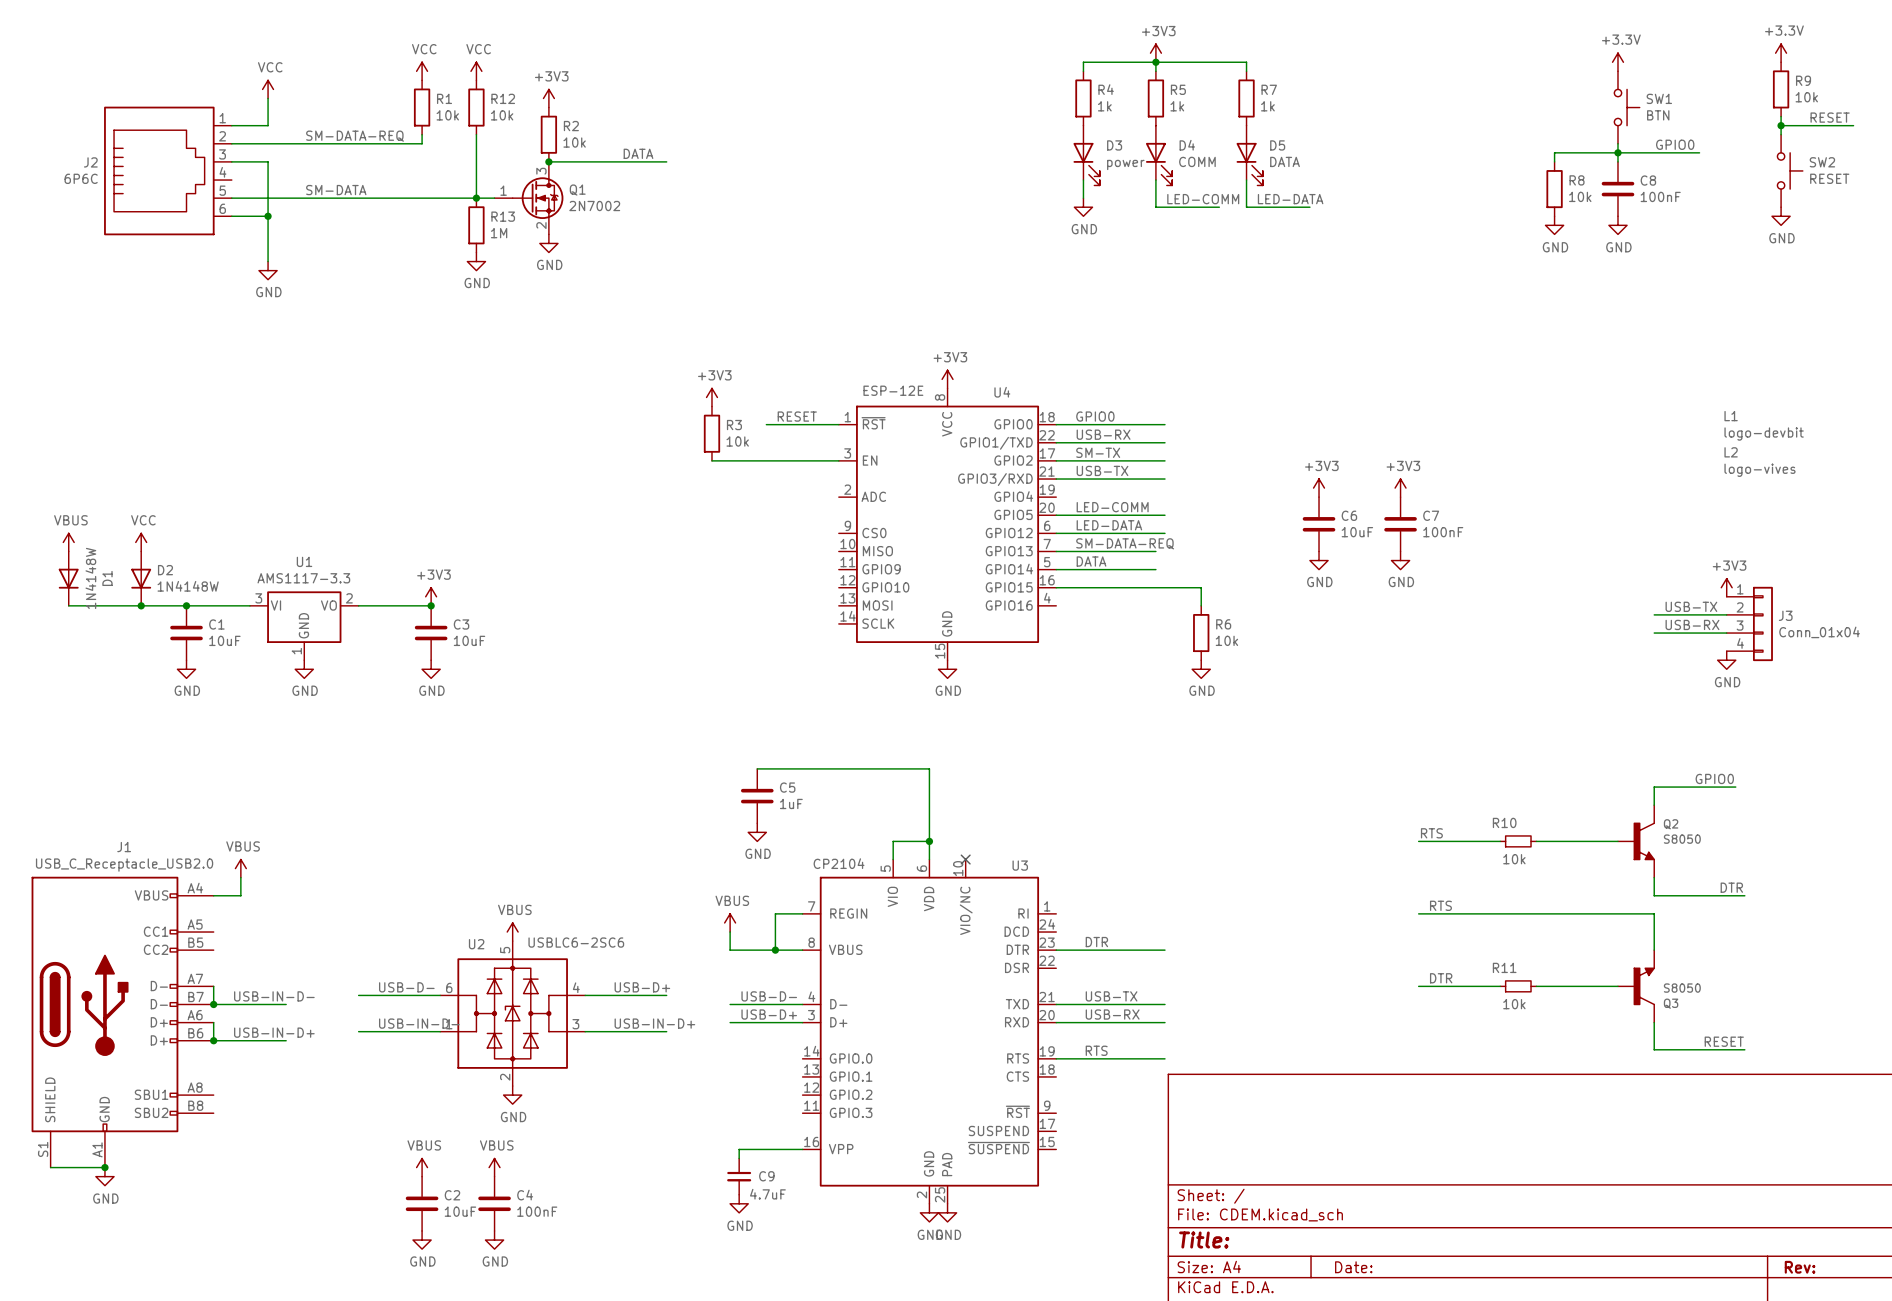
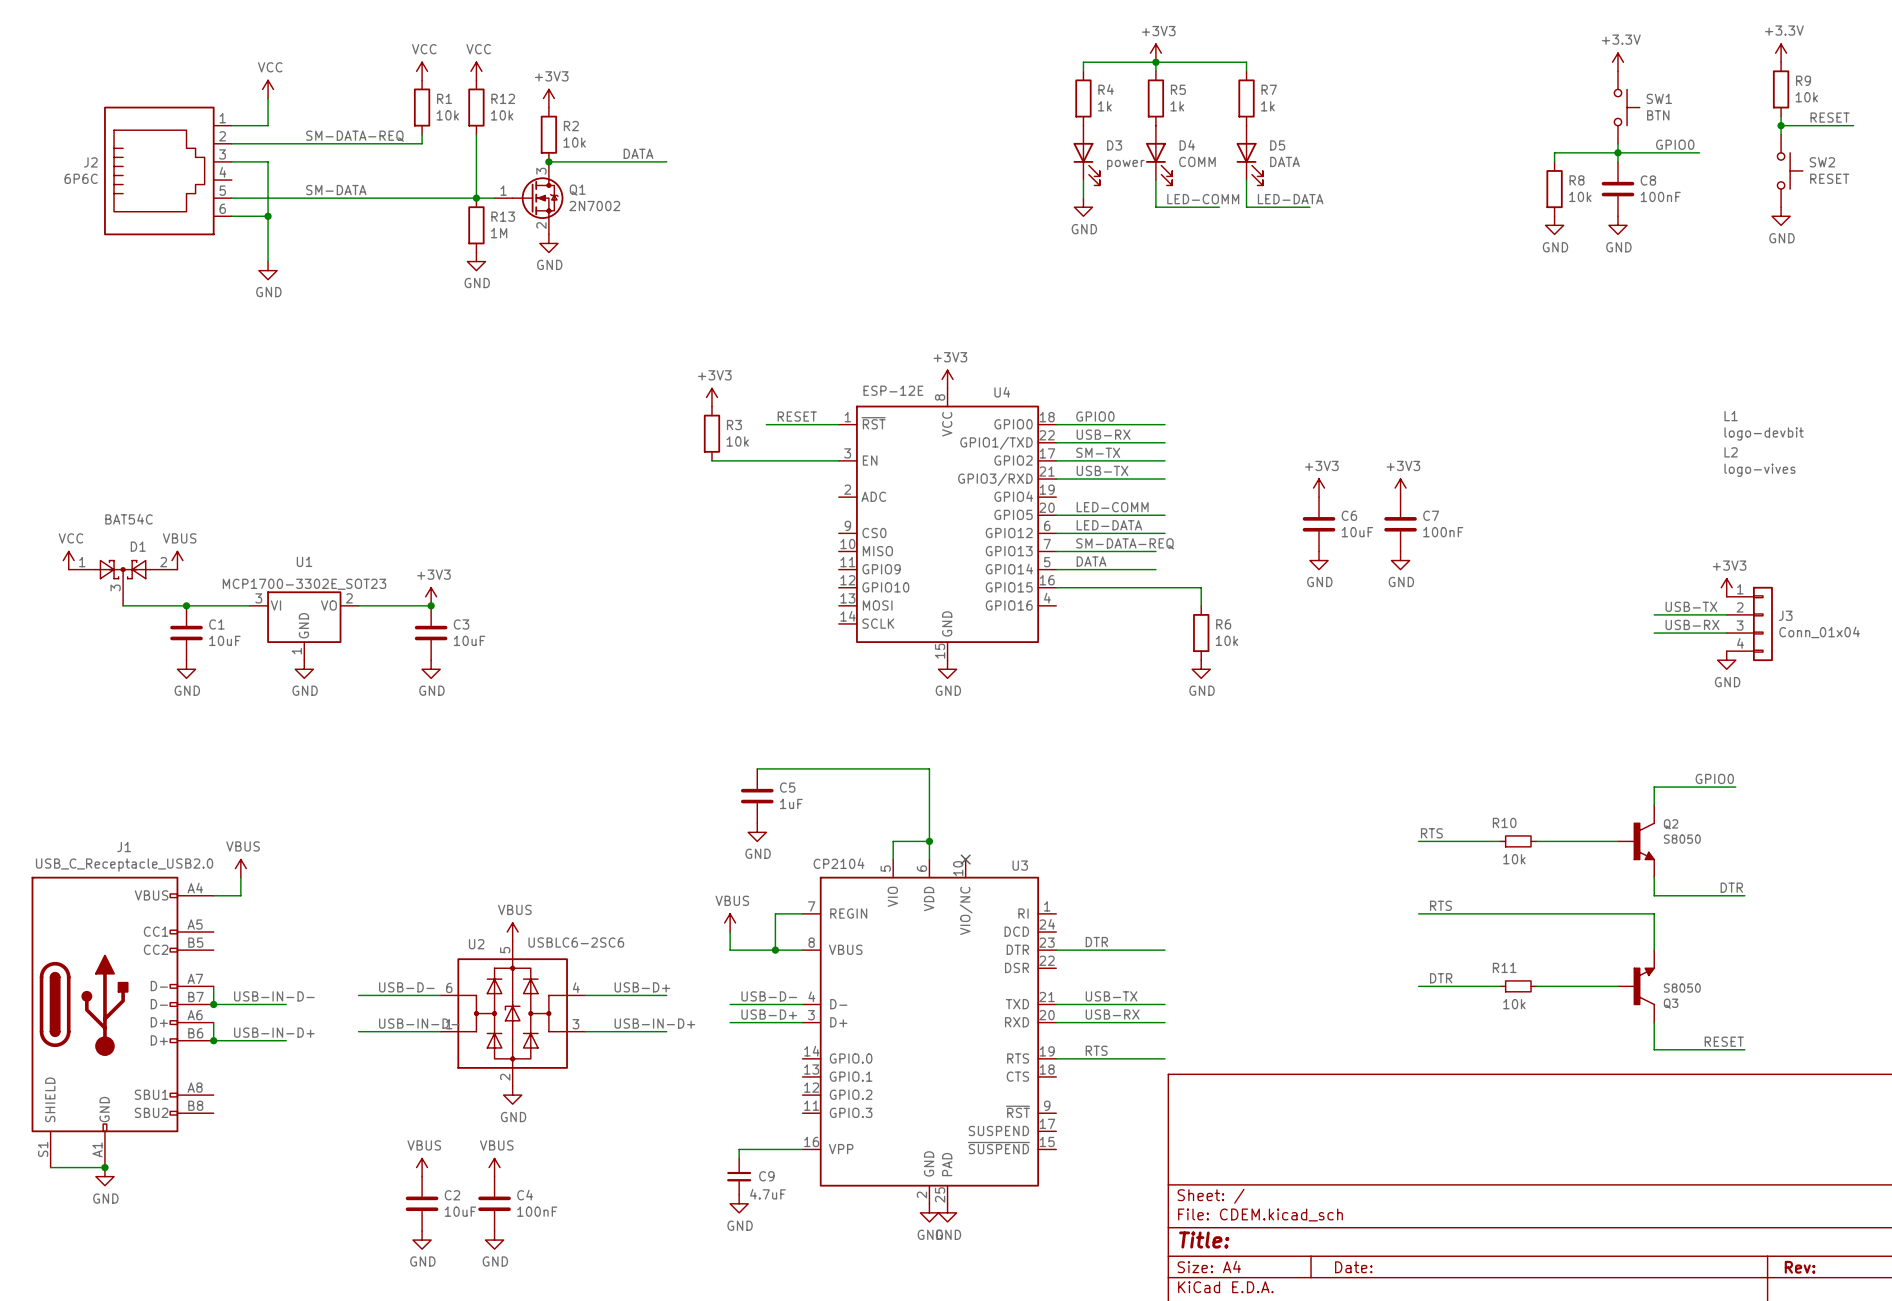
power symbol position: VBUS (68, 542) -> VBUS (177, 560)
power symbol position: VCC (141, 542) -> VCC (68, 560)
D1 symbol: [58, 551, 79, 606] -> [68, 560, 178, 606]
D1 value: 1N4148W (90, 578) -> BAT54C (129, 519)
D1 name position: D1 (107, 578) -> D1 (138, 546)
D2: 1N4148W (141, 578) -> none
U1 value: AMS1117-3.3 (303, 578) -> MCP1700-3302E_SOT23 (304, 584)
wire: (68, 605) (123, 605) -> none
junction: (141, 605) -> none

